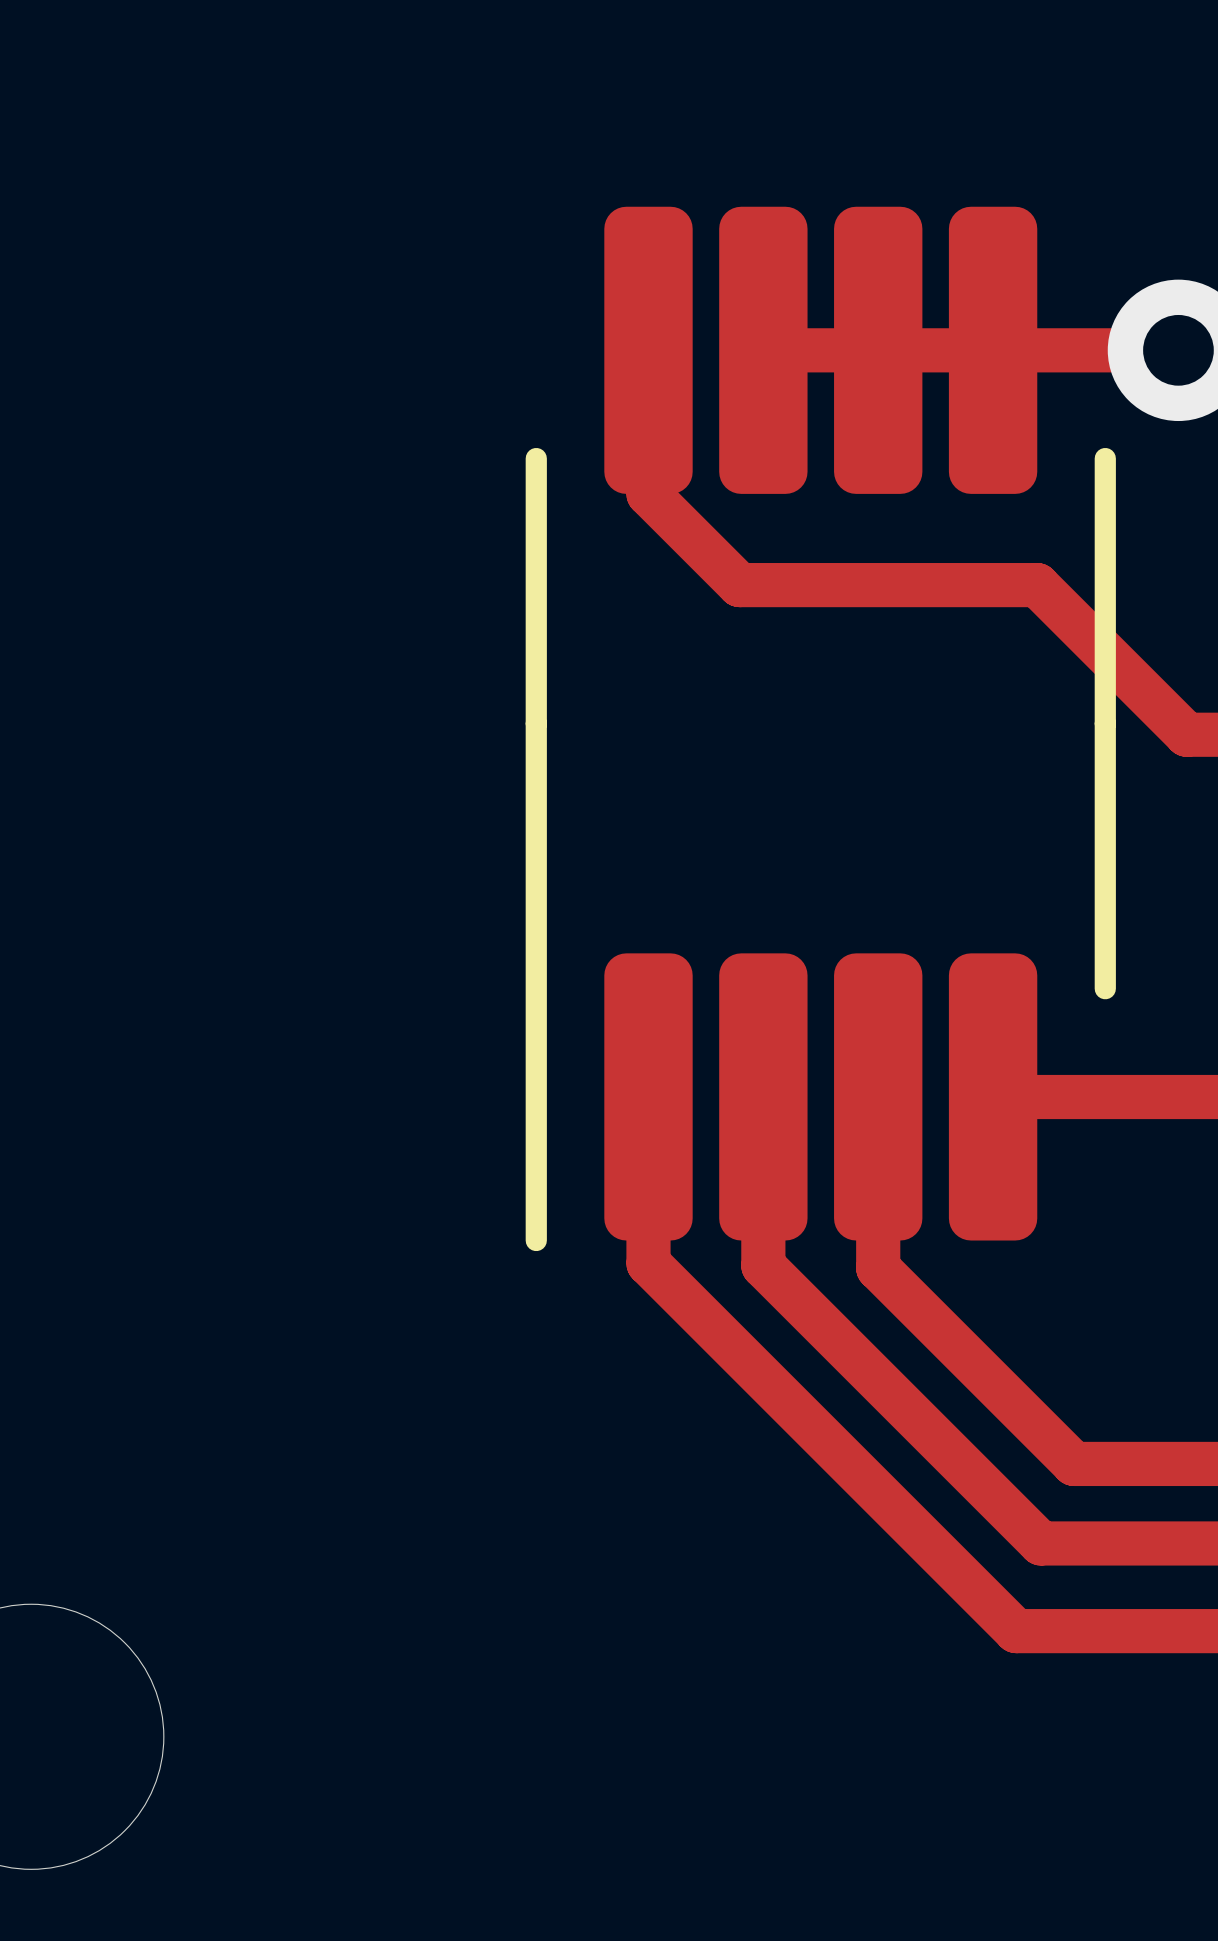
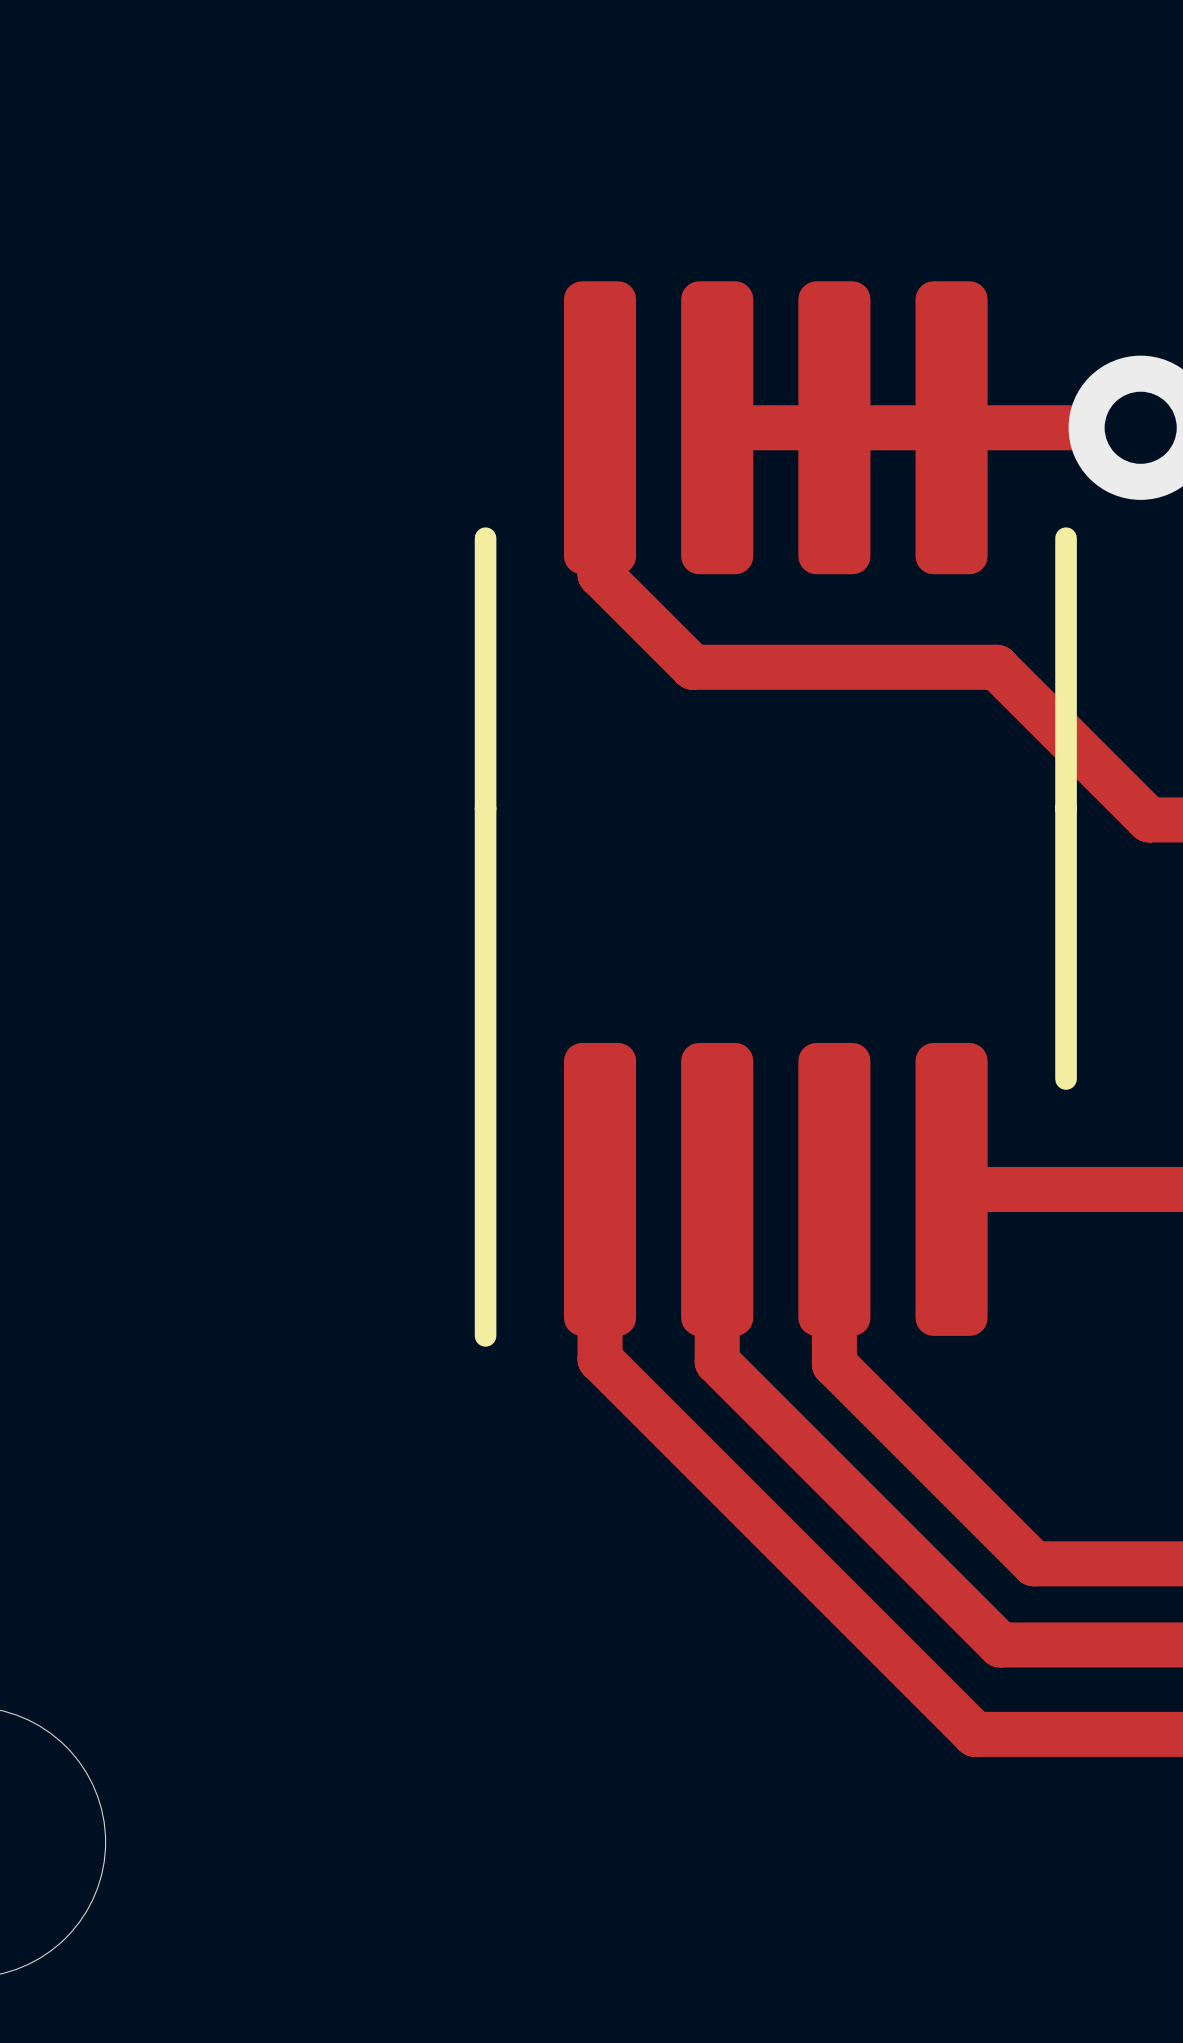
part footprint: [525, 206, 1116, 1252] -> [474, 281, 1077, 1347]

